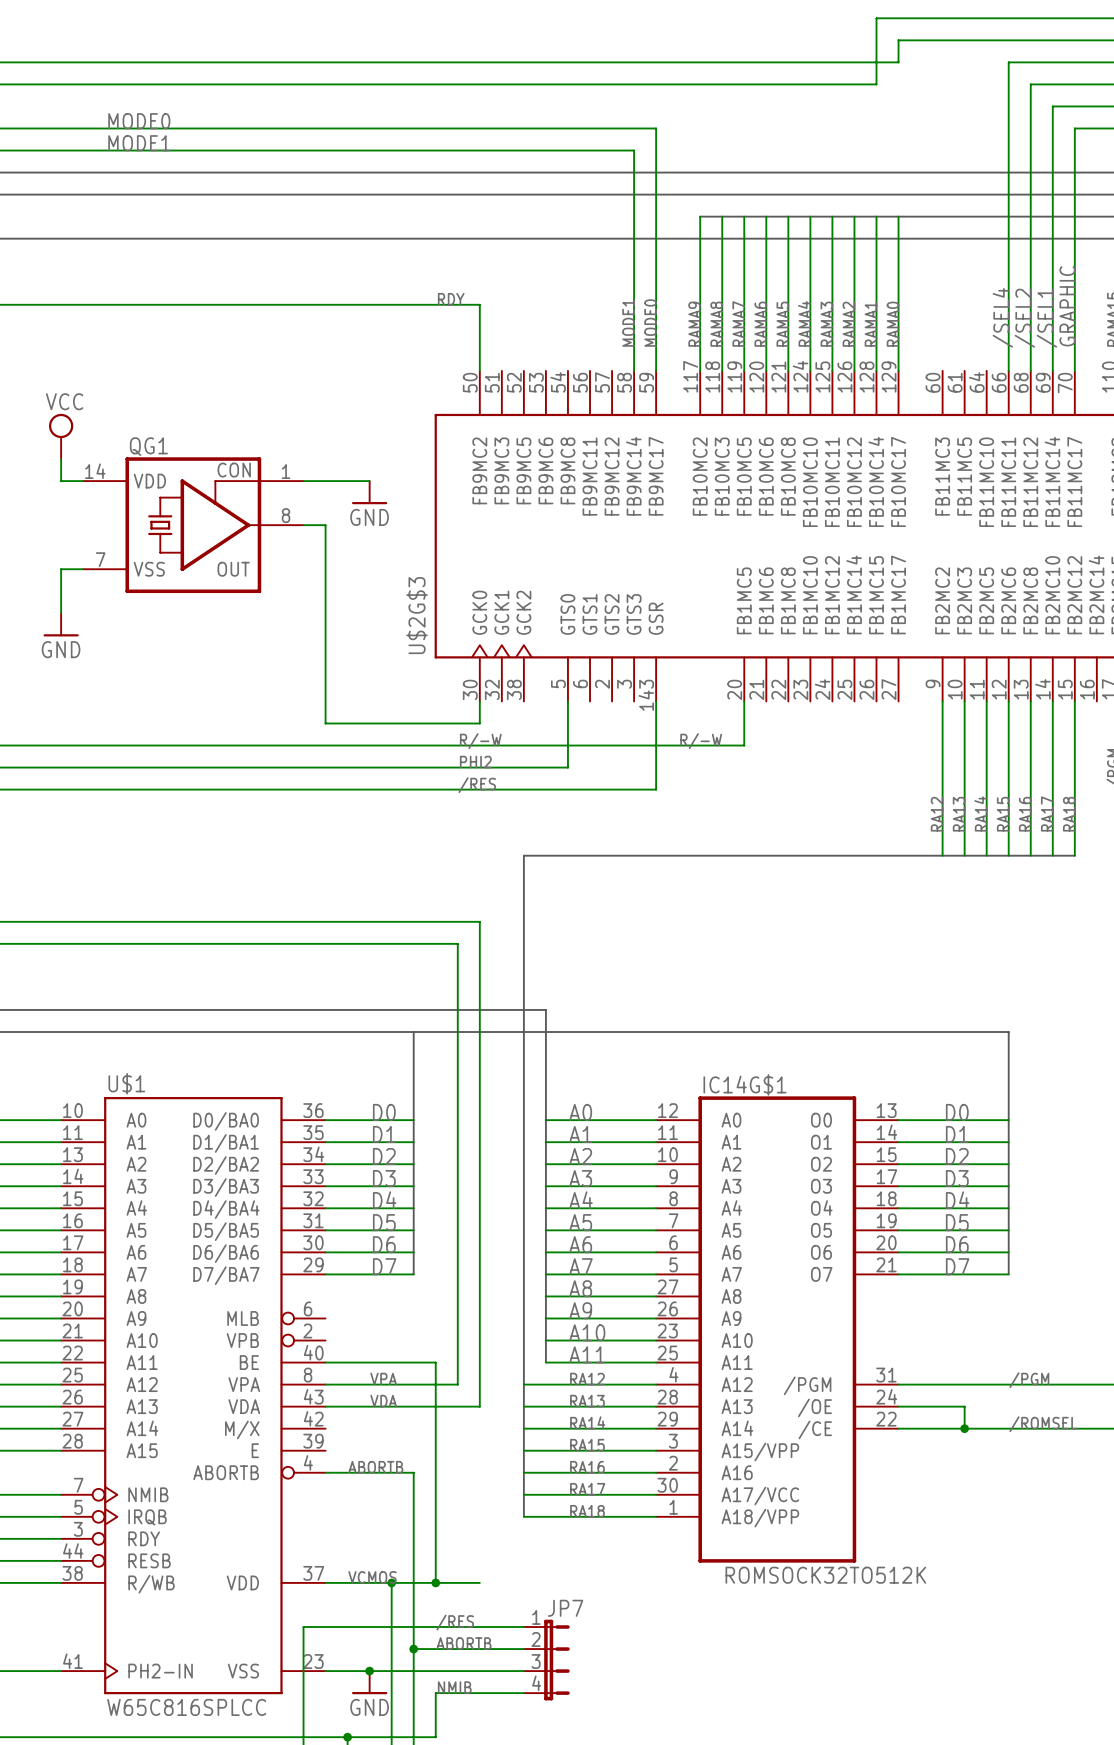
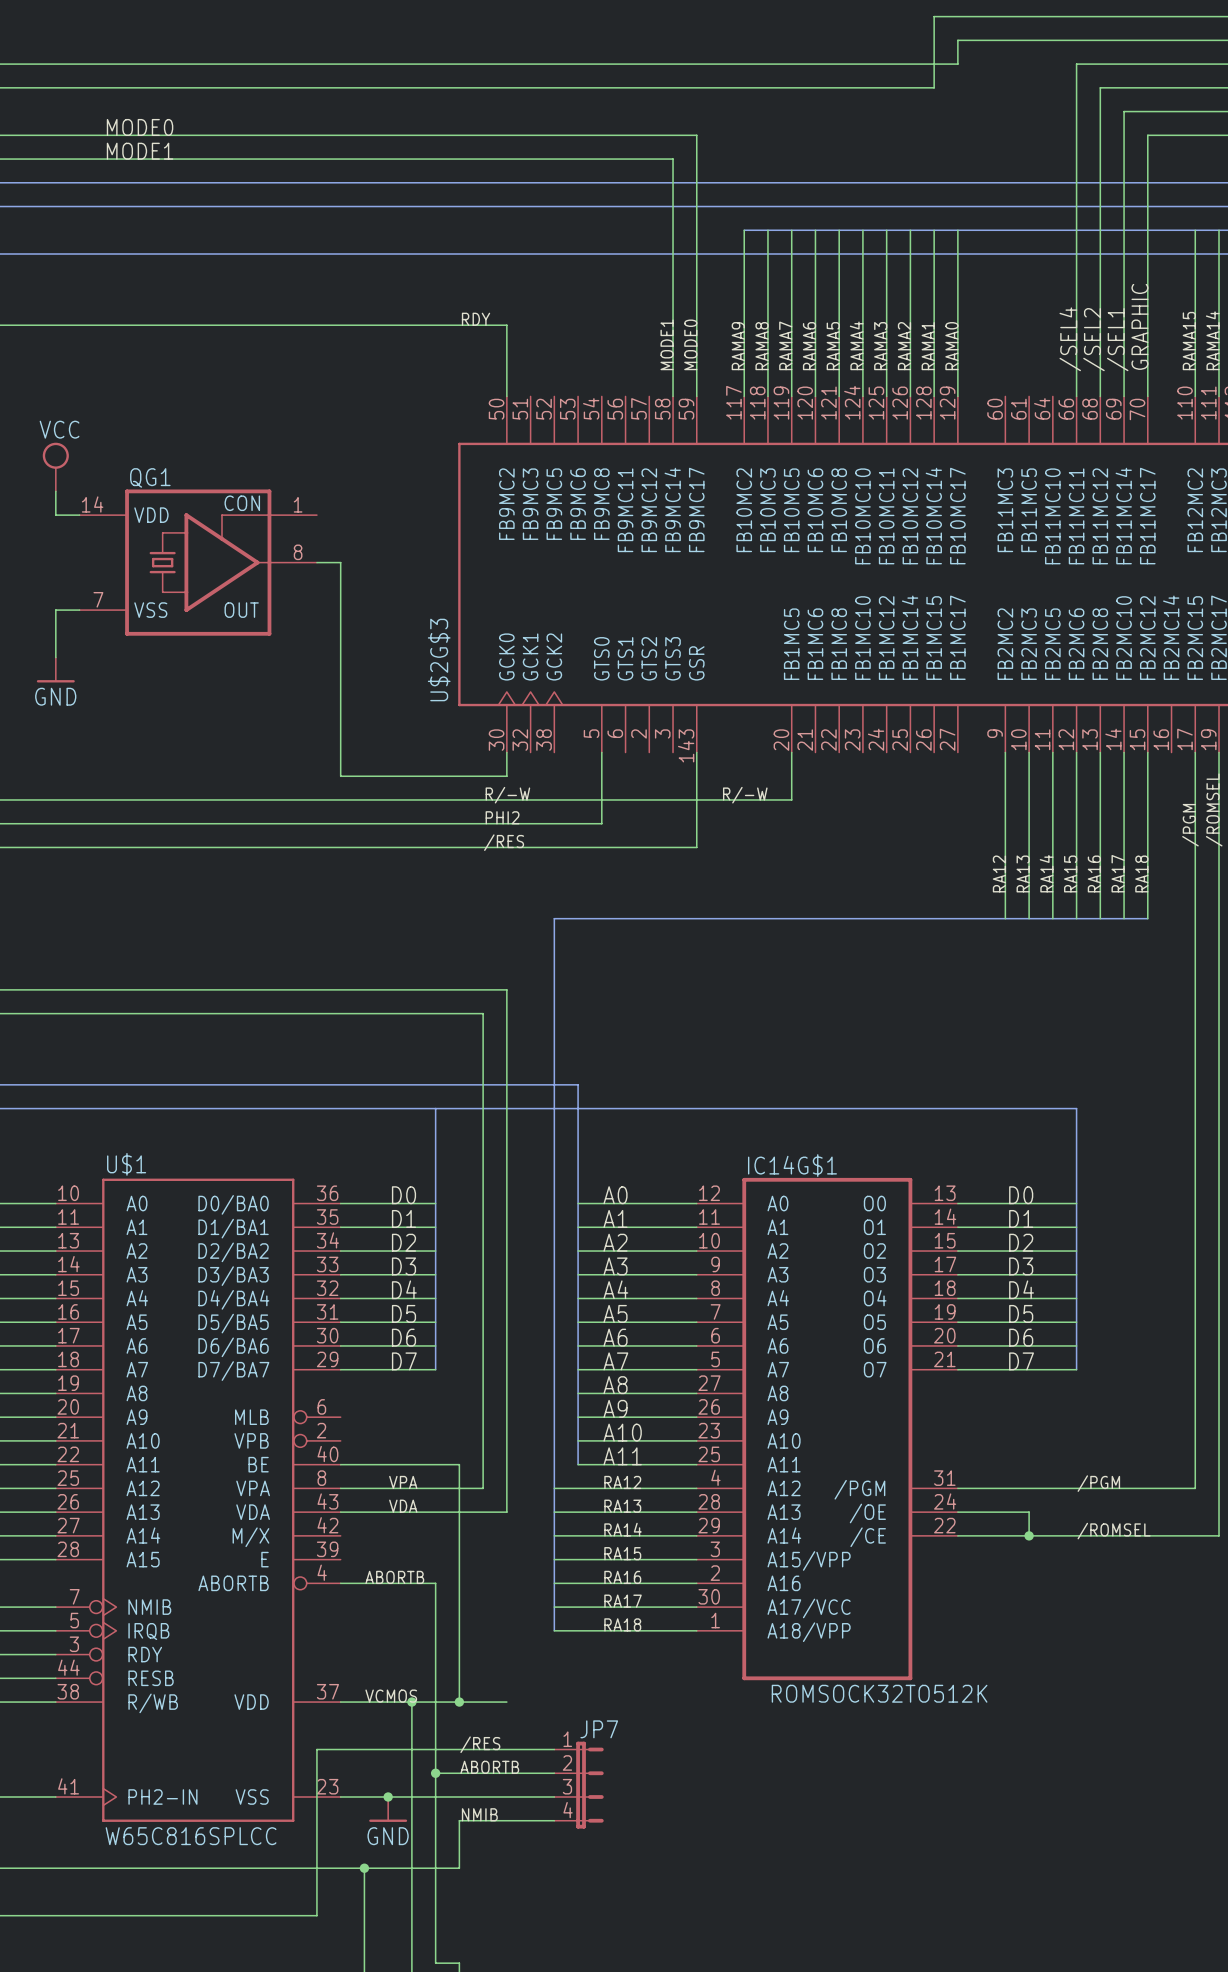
wire: (303, 481) (369, 481) -> none
power symbol: GND (369, 492) -> none

